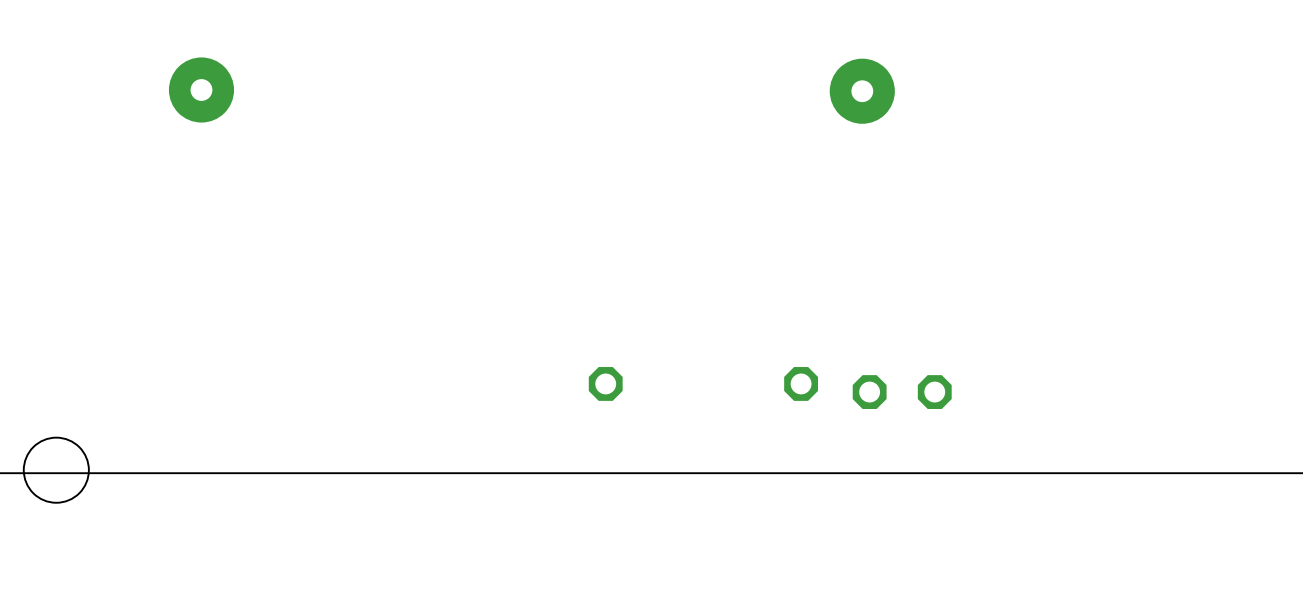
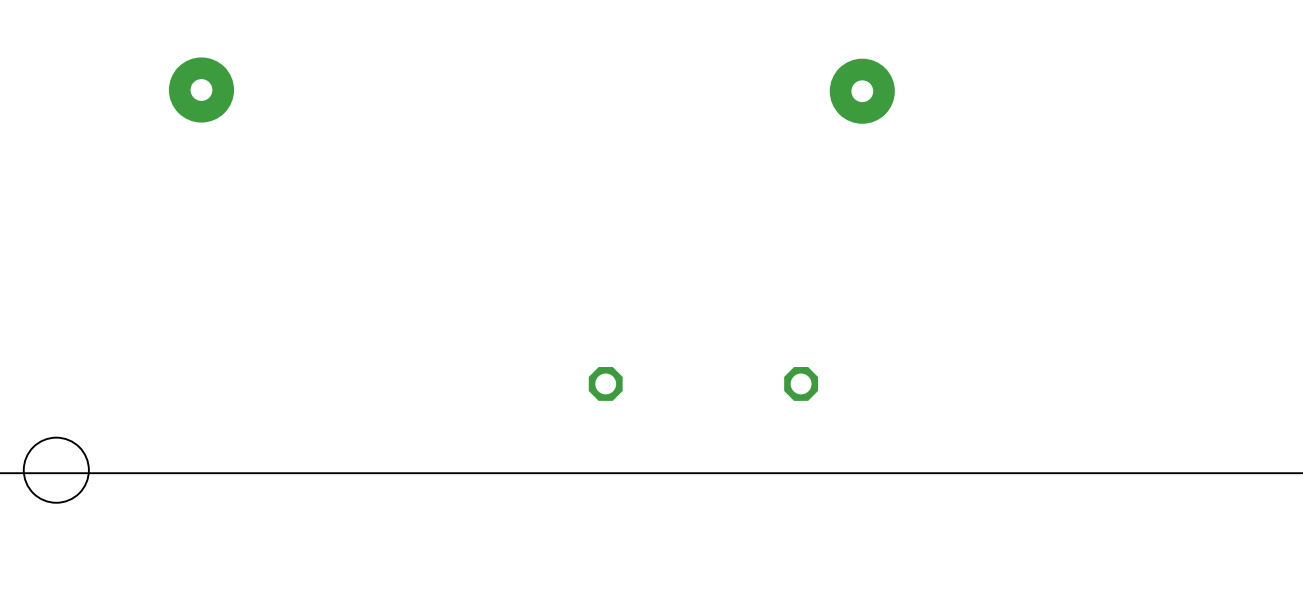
part: (902, 392) -> none

